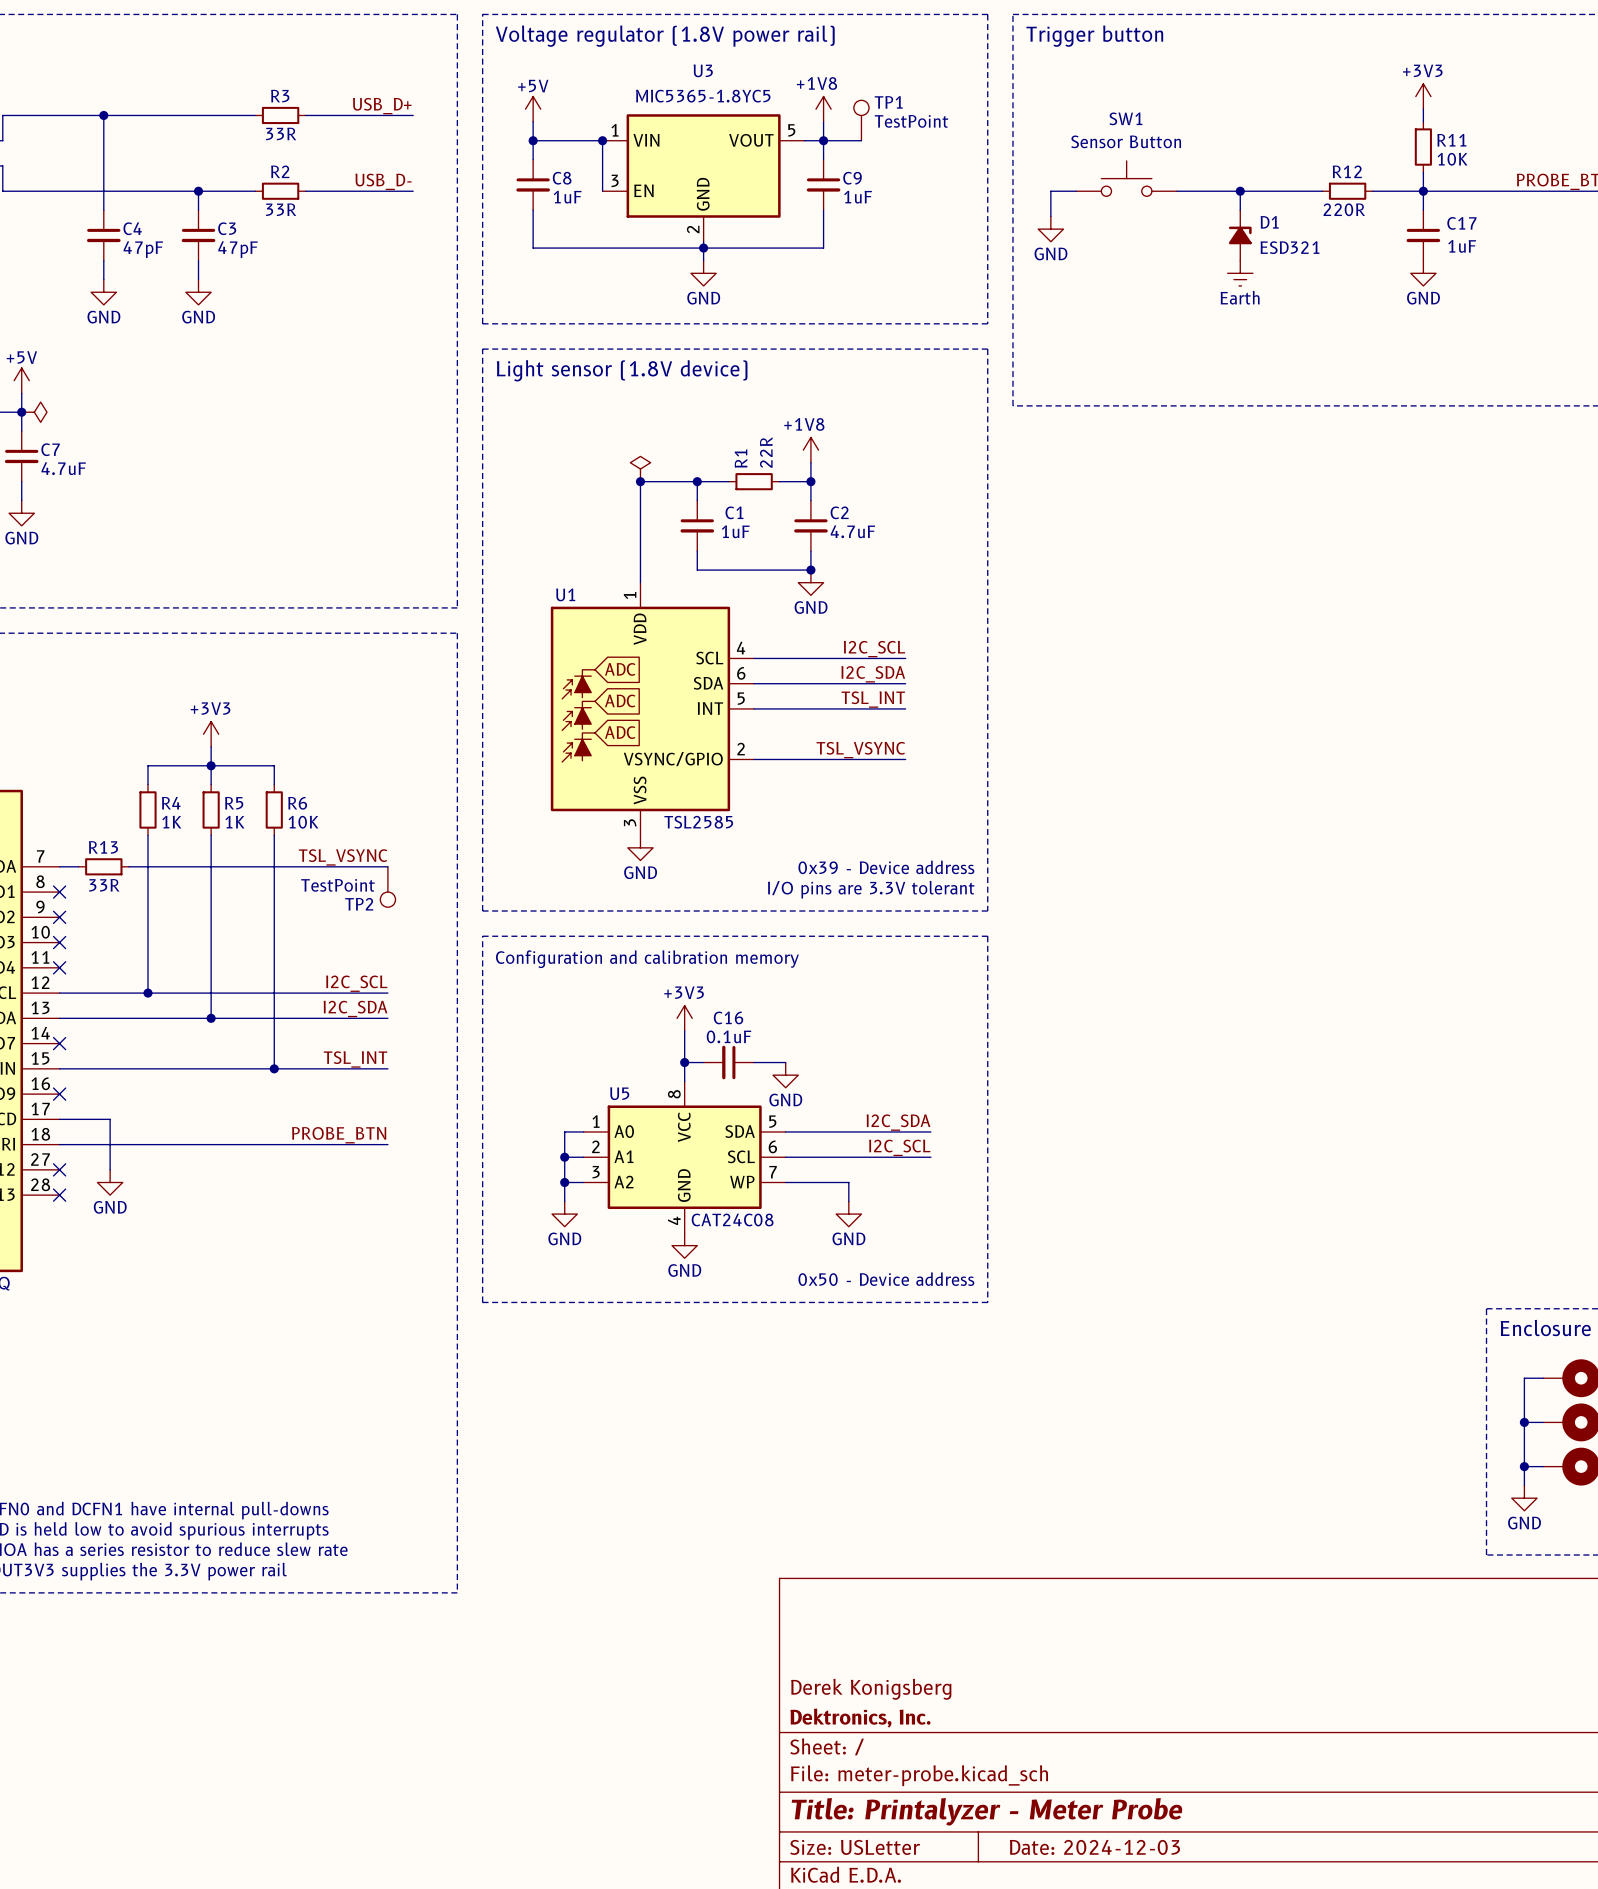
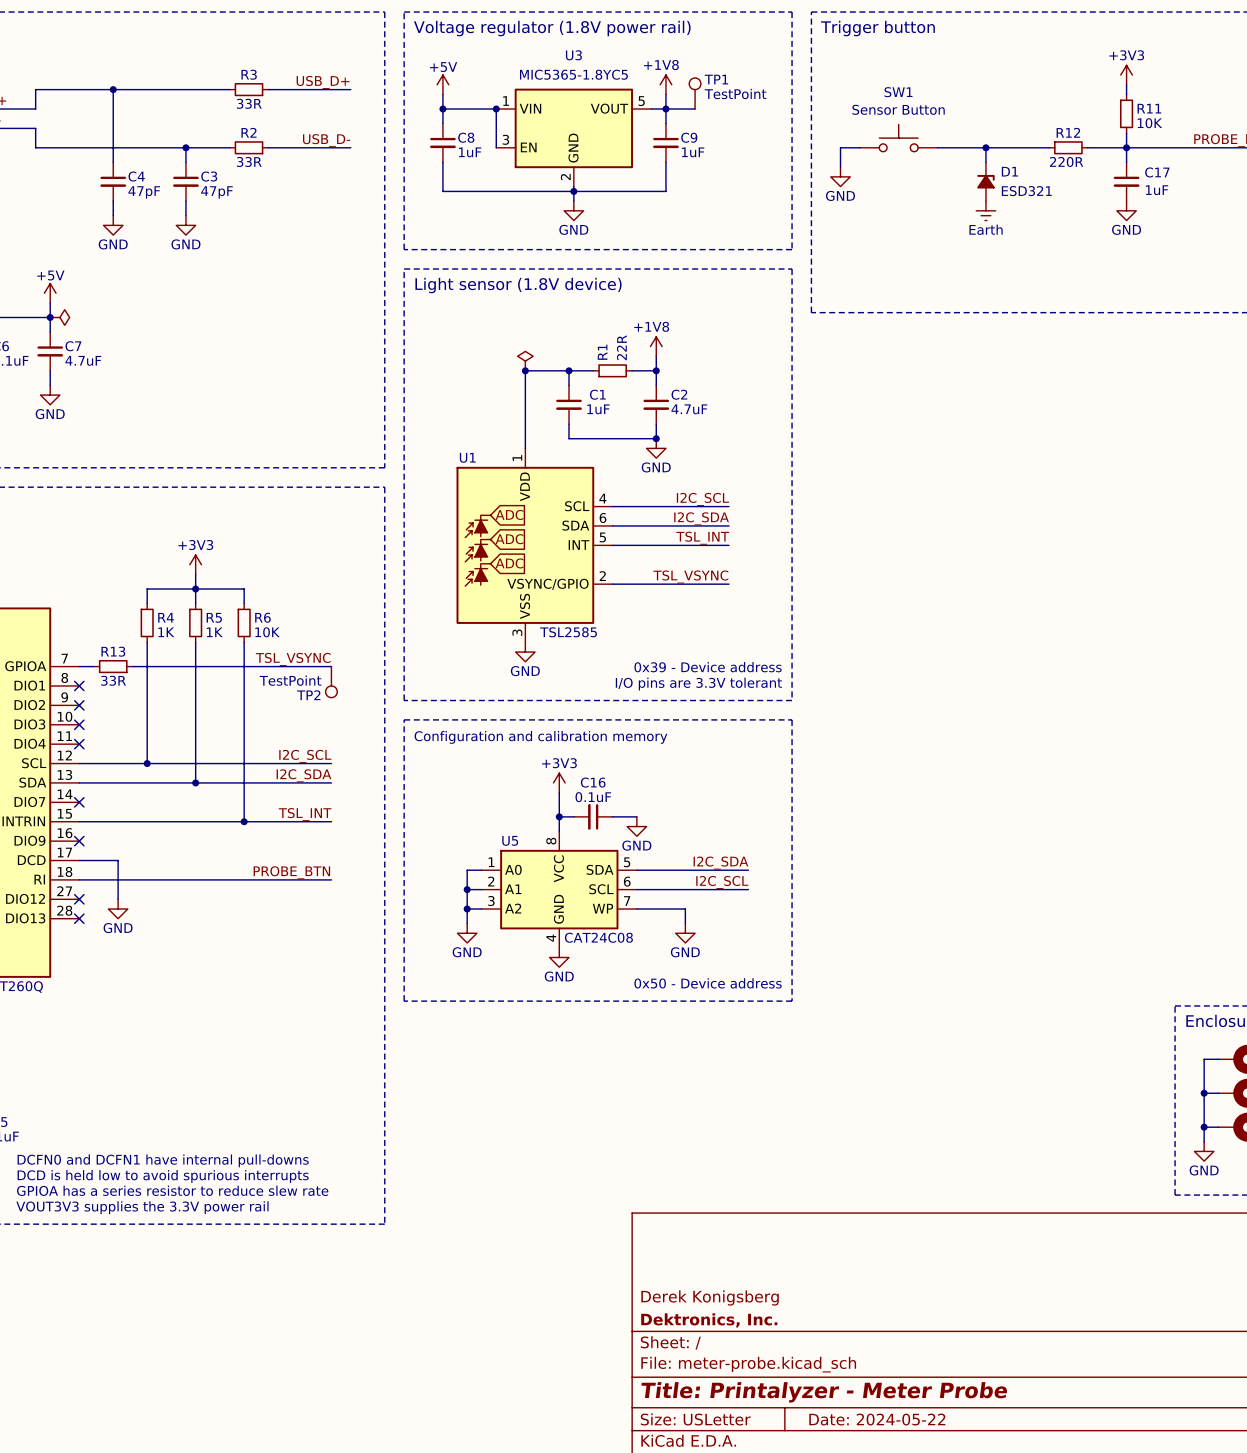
title block: Date: 2024-12-03 (1094, 1847) -> Date: 2024-05-22 (877, 1419)

